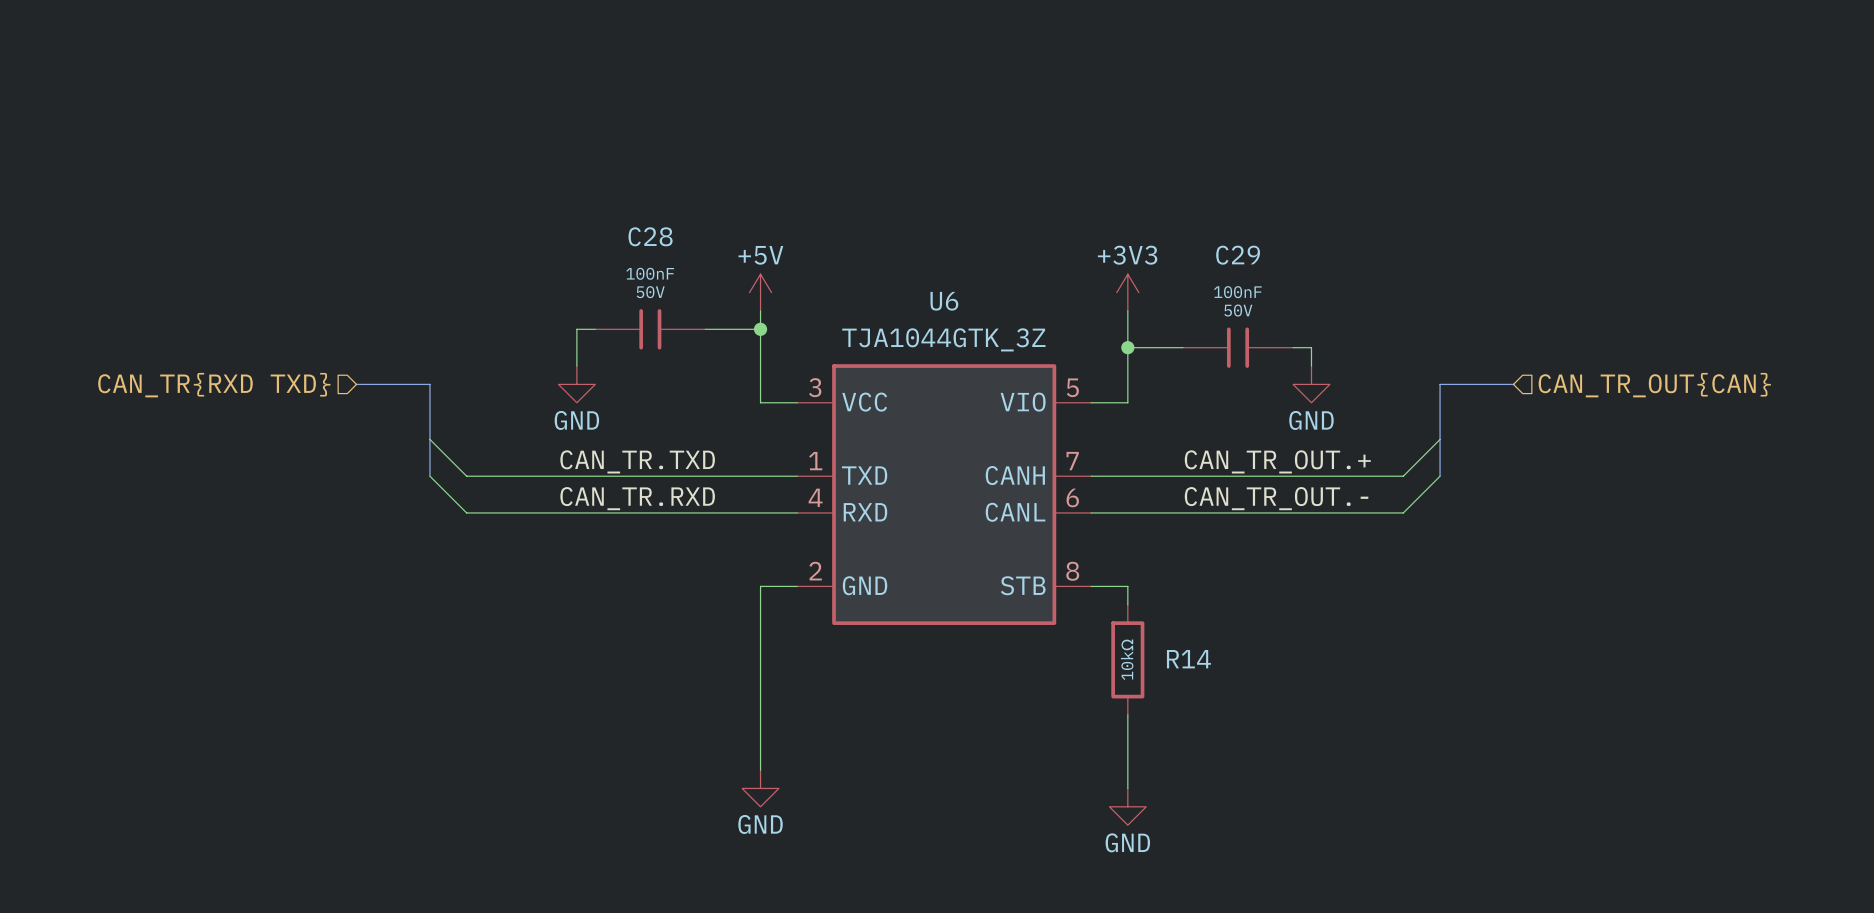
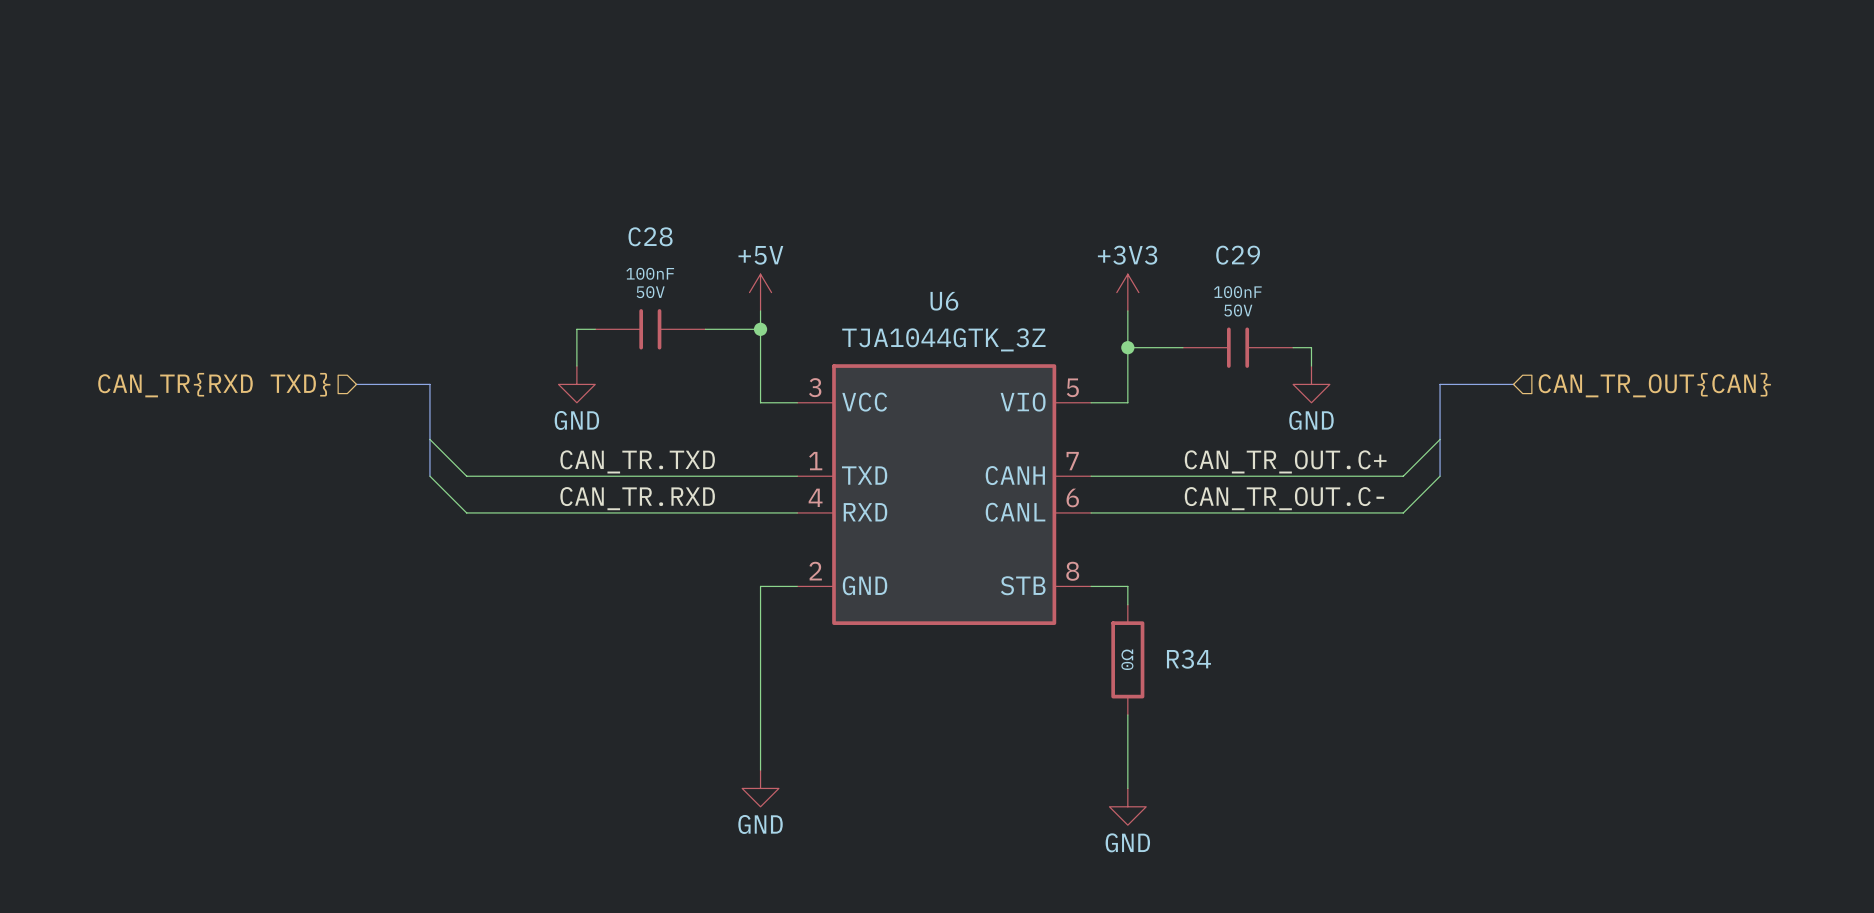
label: CAN_TR_OUT.+ (1277, 461) -> CAN_TR_OUT.C+ (1285, 461)
label: CAN_TR_OUT.- (1276, 498) -> CAN_TR_OUT.C- (1284, 498)
R14 value: 10kΩ (1127, 659) -> 0Ω (1127, 659)
R14 name: R14 (1188, 659) -> R34 (1188, 659)

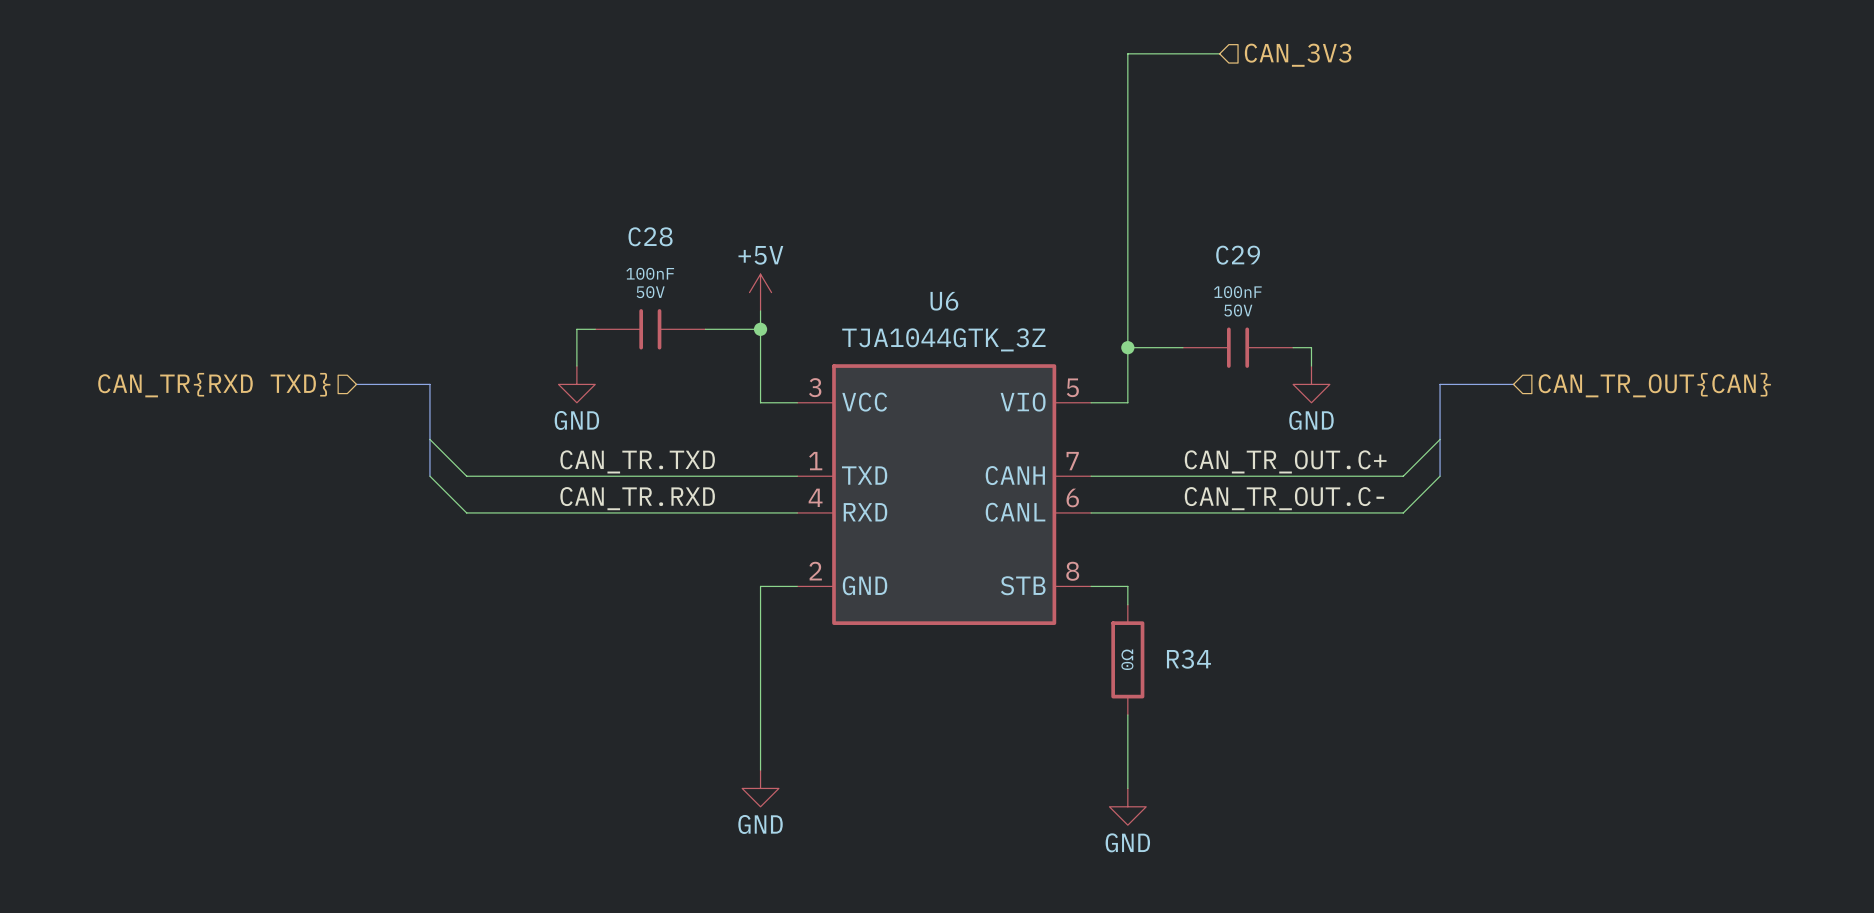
wire: none -> (1219, 53) (1127, 53) (1127, 310)
hierarchical label: none -> CAN_3V3 (1298, 55)
power symbol: +3V3 (1127, 292) -> none

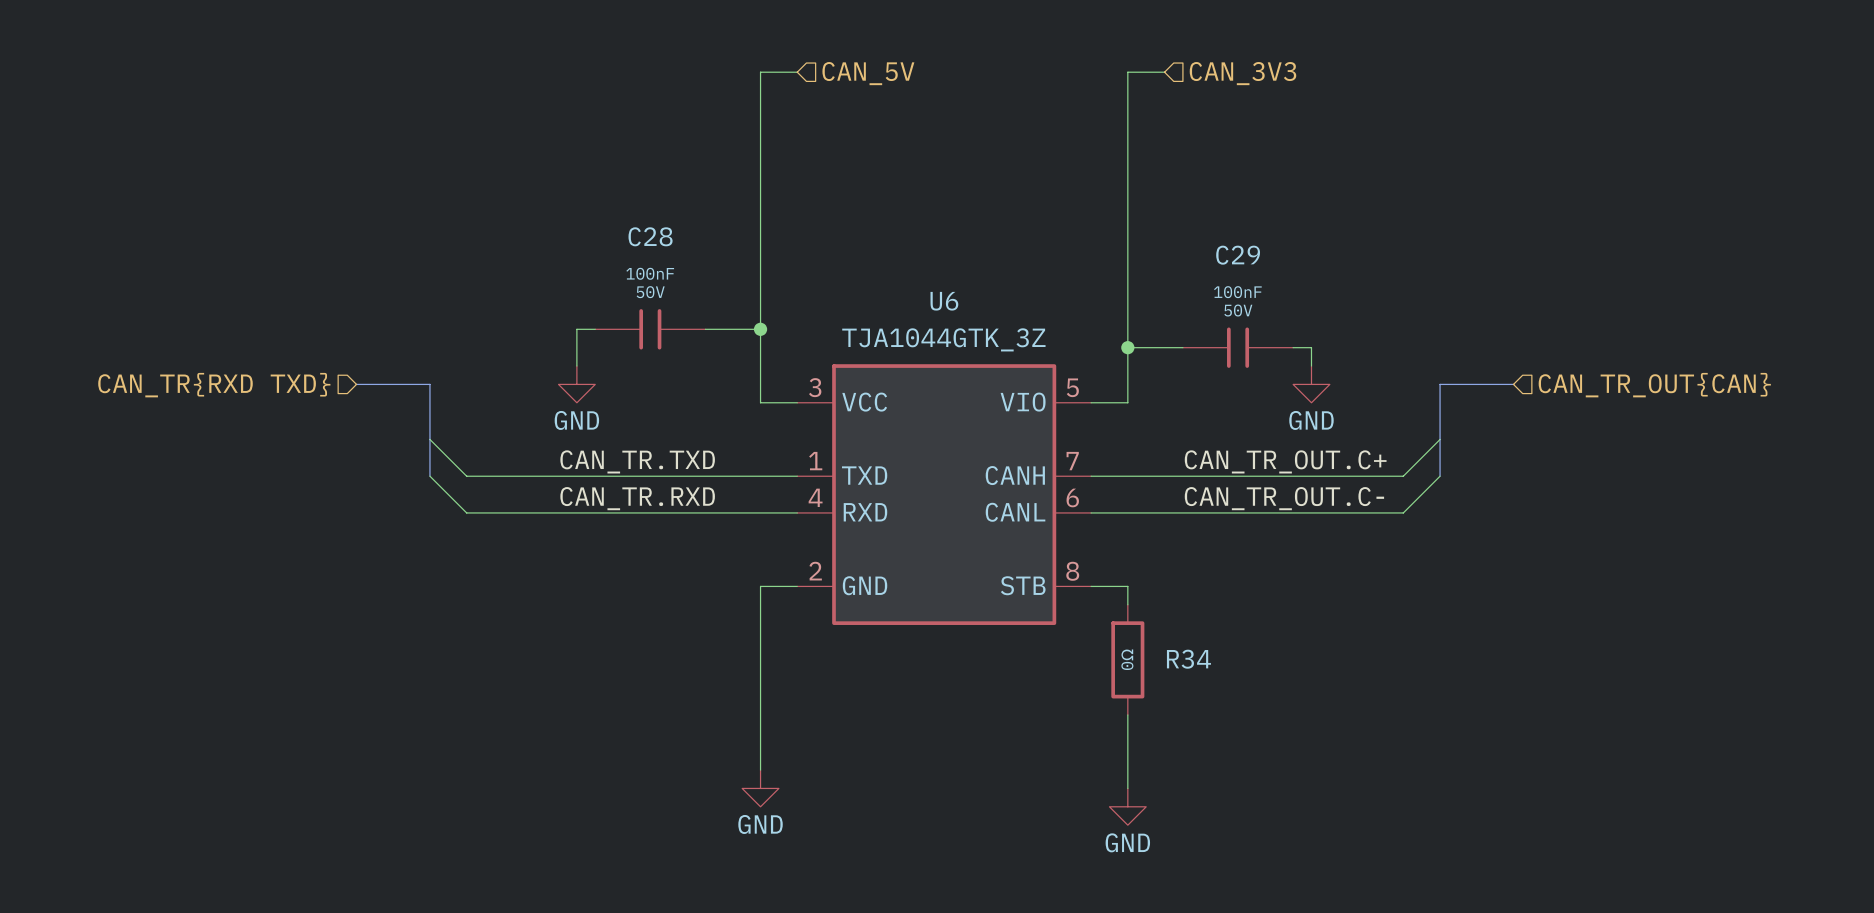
wire: (1219, 53) (1127, 53) (1127, 72) -> (1164, 72) (1127, 72)
hierarchical label position: CAN_3V3 (1298, 55) -> CAN_3V3 (1242, 73)
wire: none -> (797, 72) (760, 72) (760, 310)
hierarchical label: none -> CAN_5V (868, 73)
power symbol: +5V (760, 292) -> none

